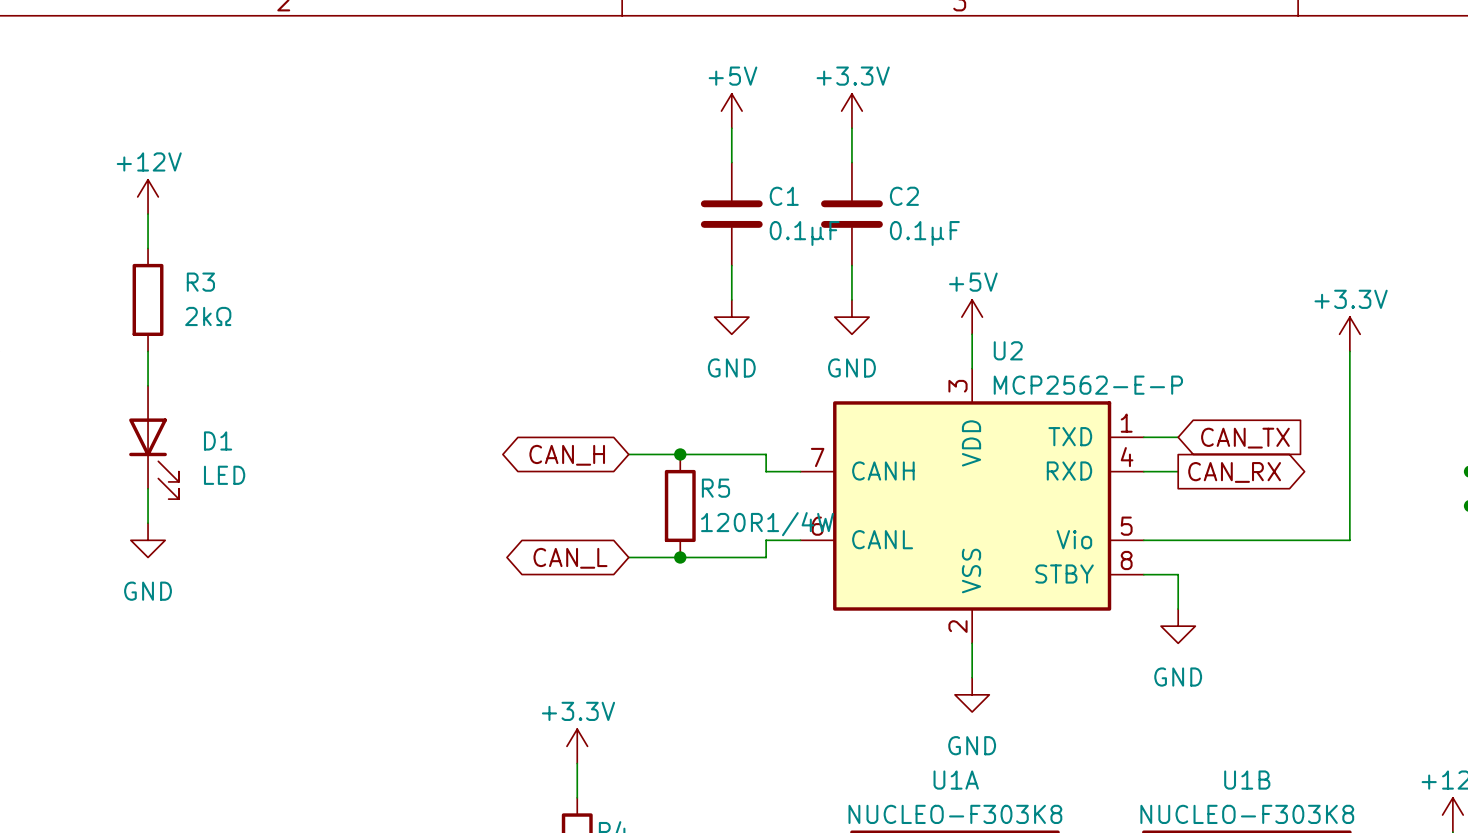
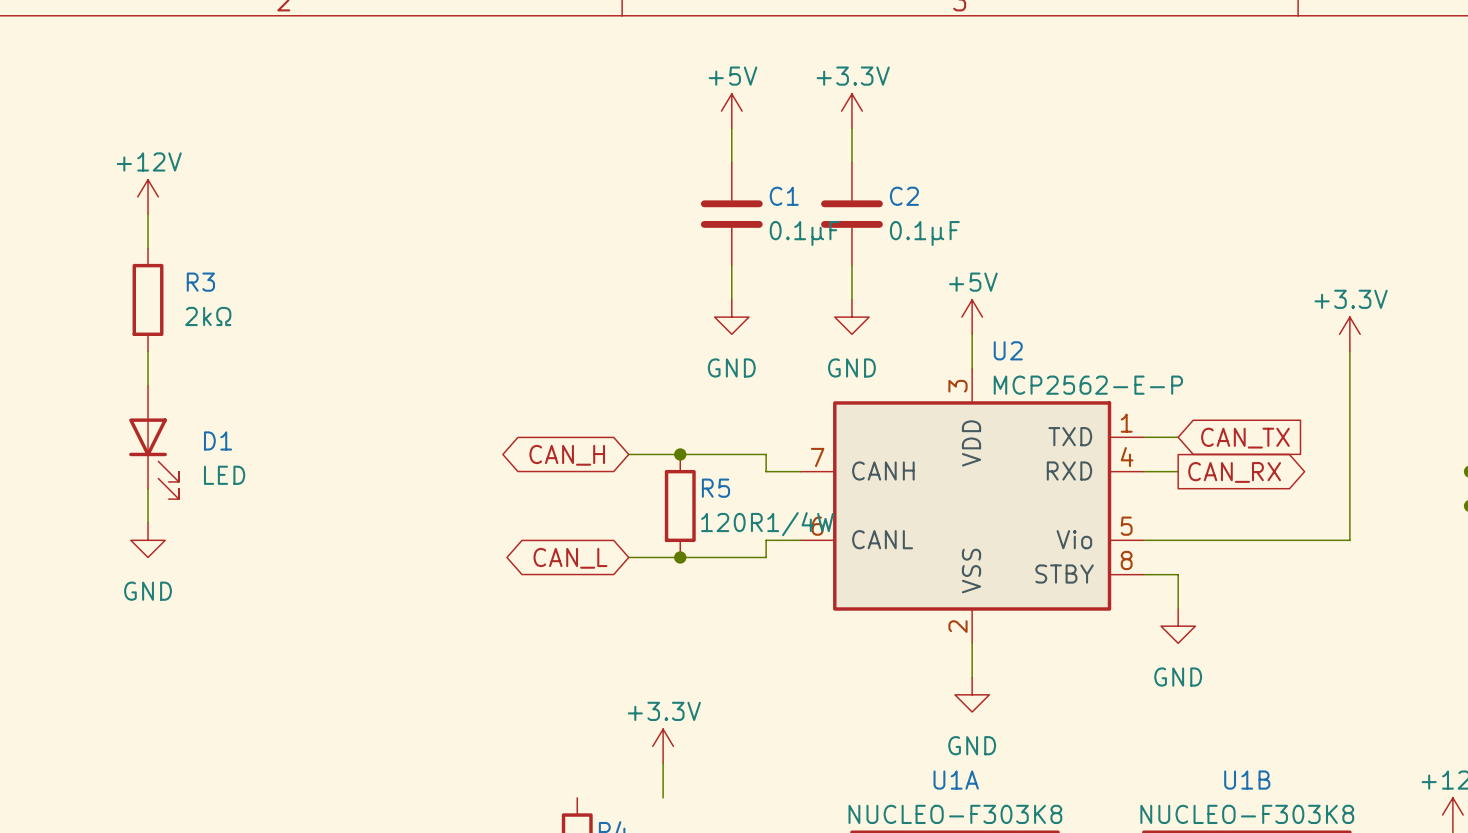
power symbol position: +3.3V (577, 746) -> +3.3V (663, 746)
wire: (577, 763) (577, 797) -> (663, 763) (663, 797)

